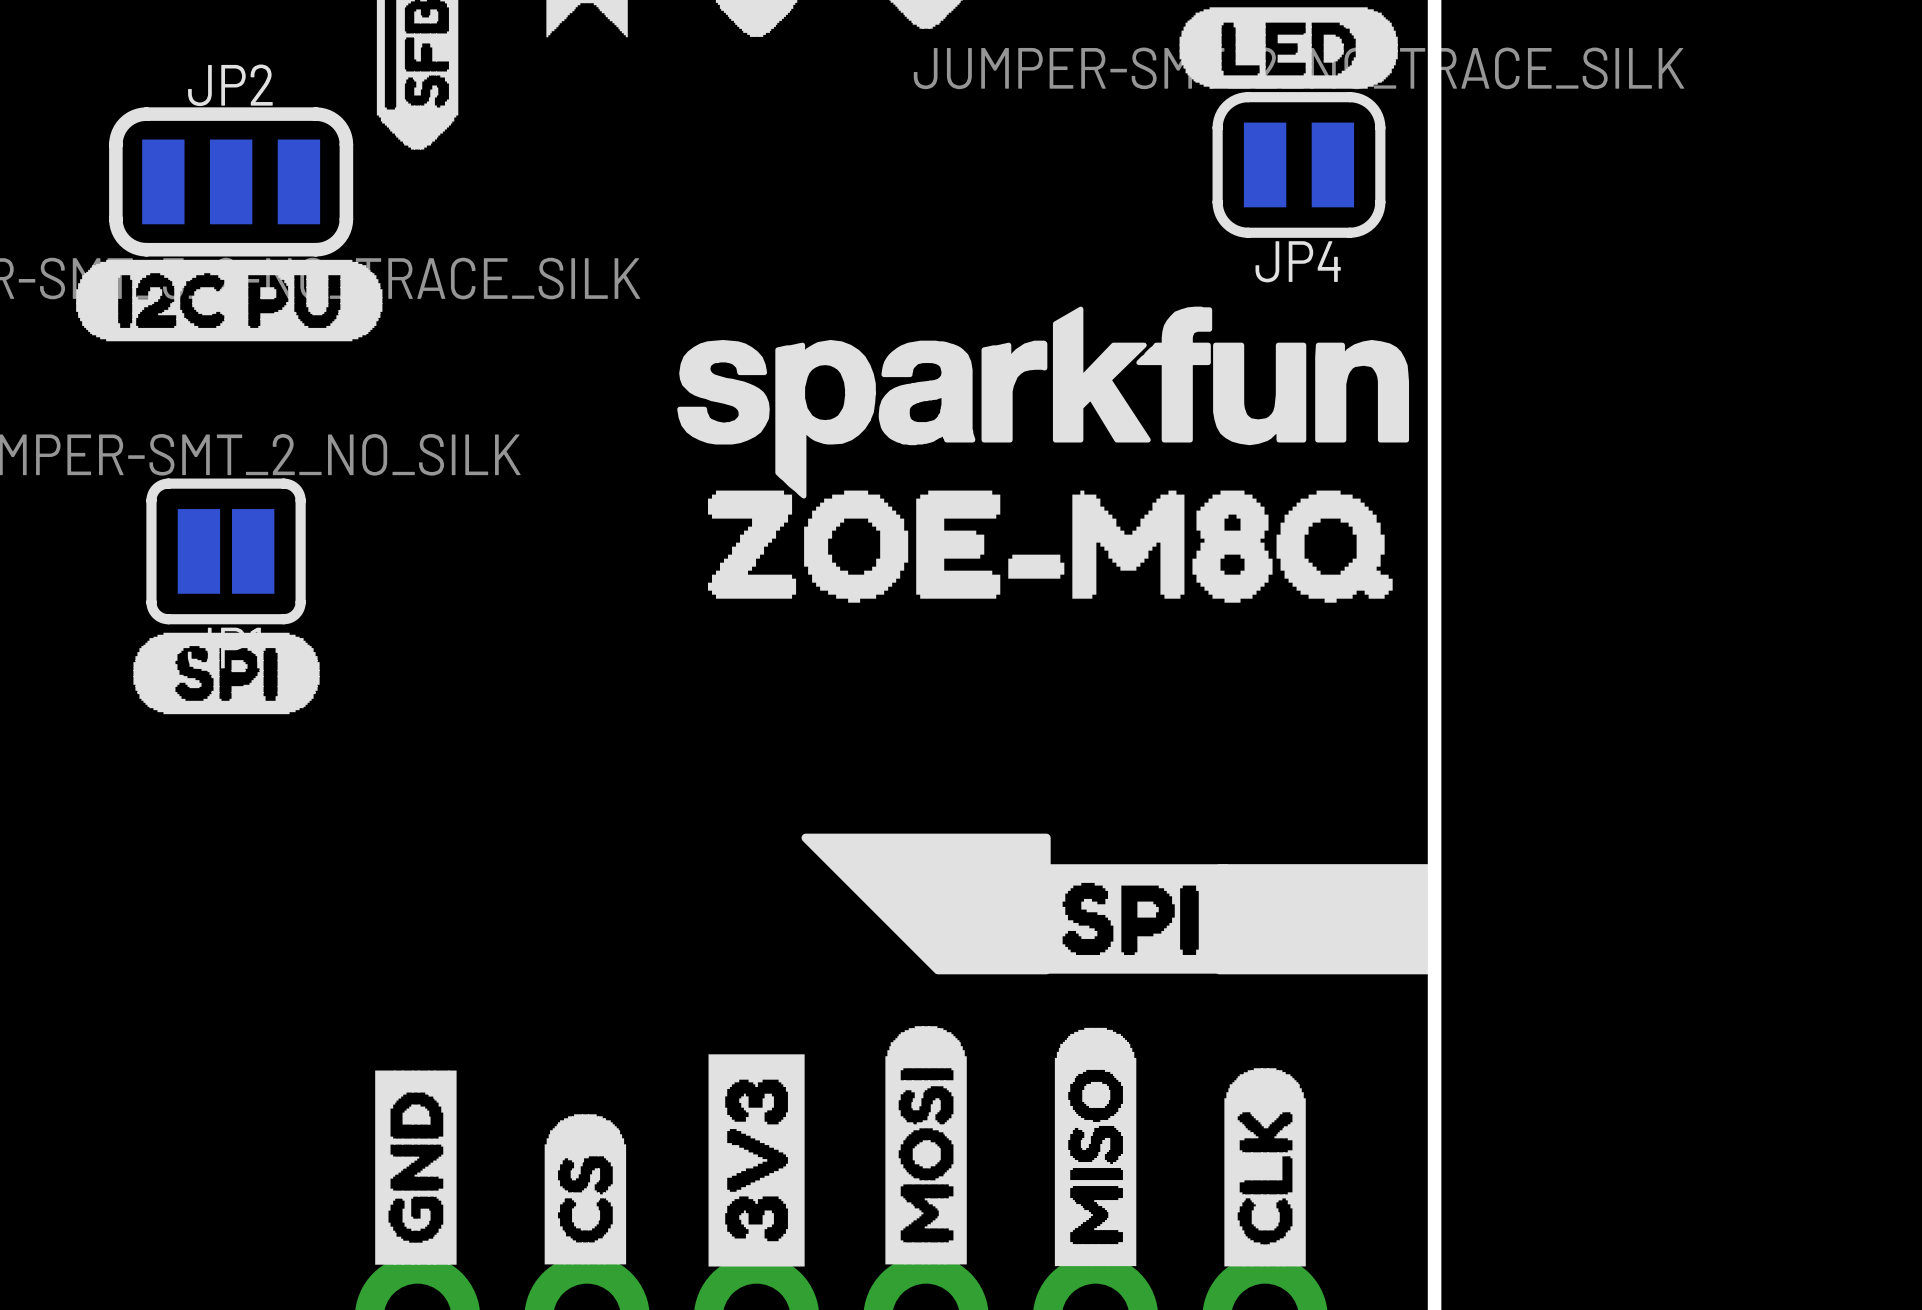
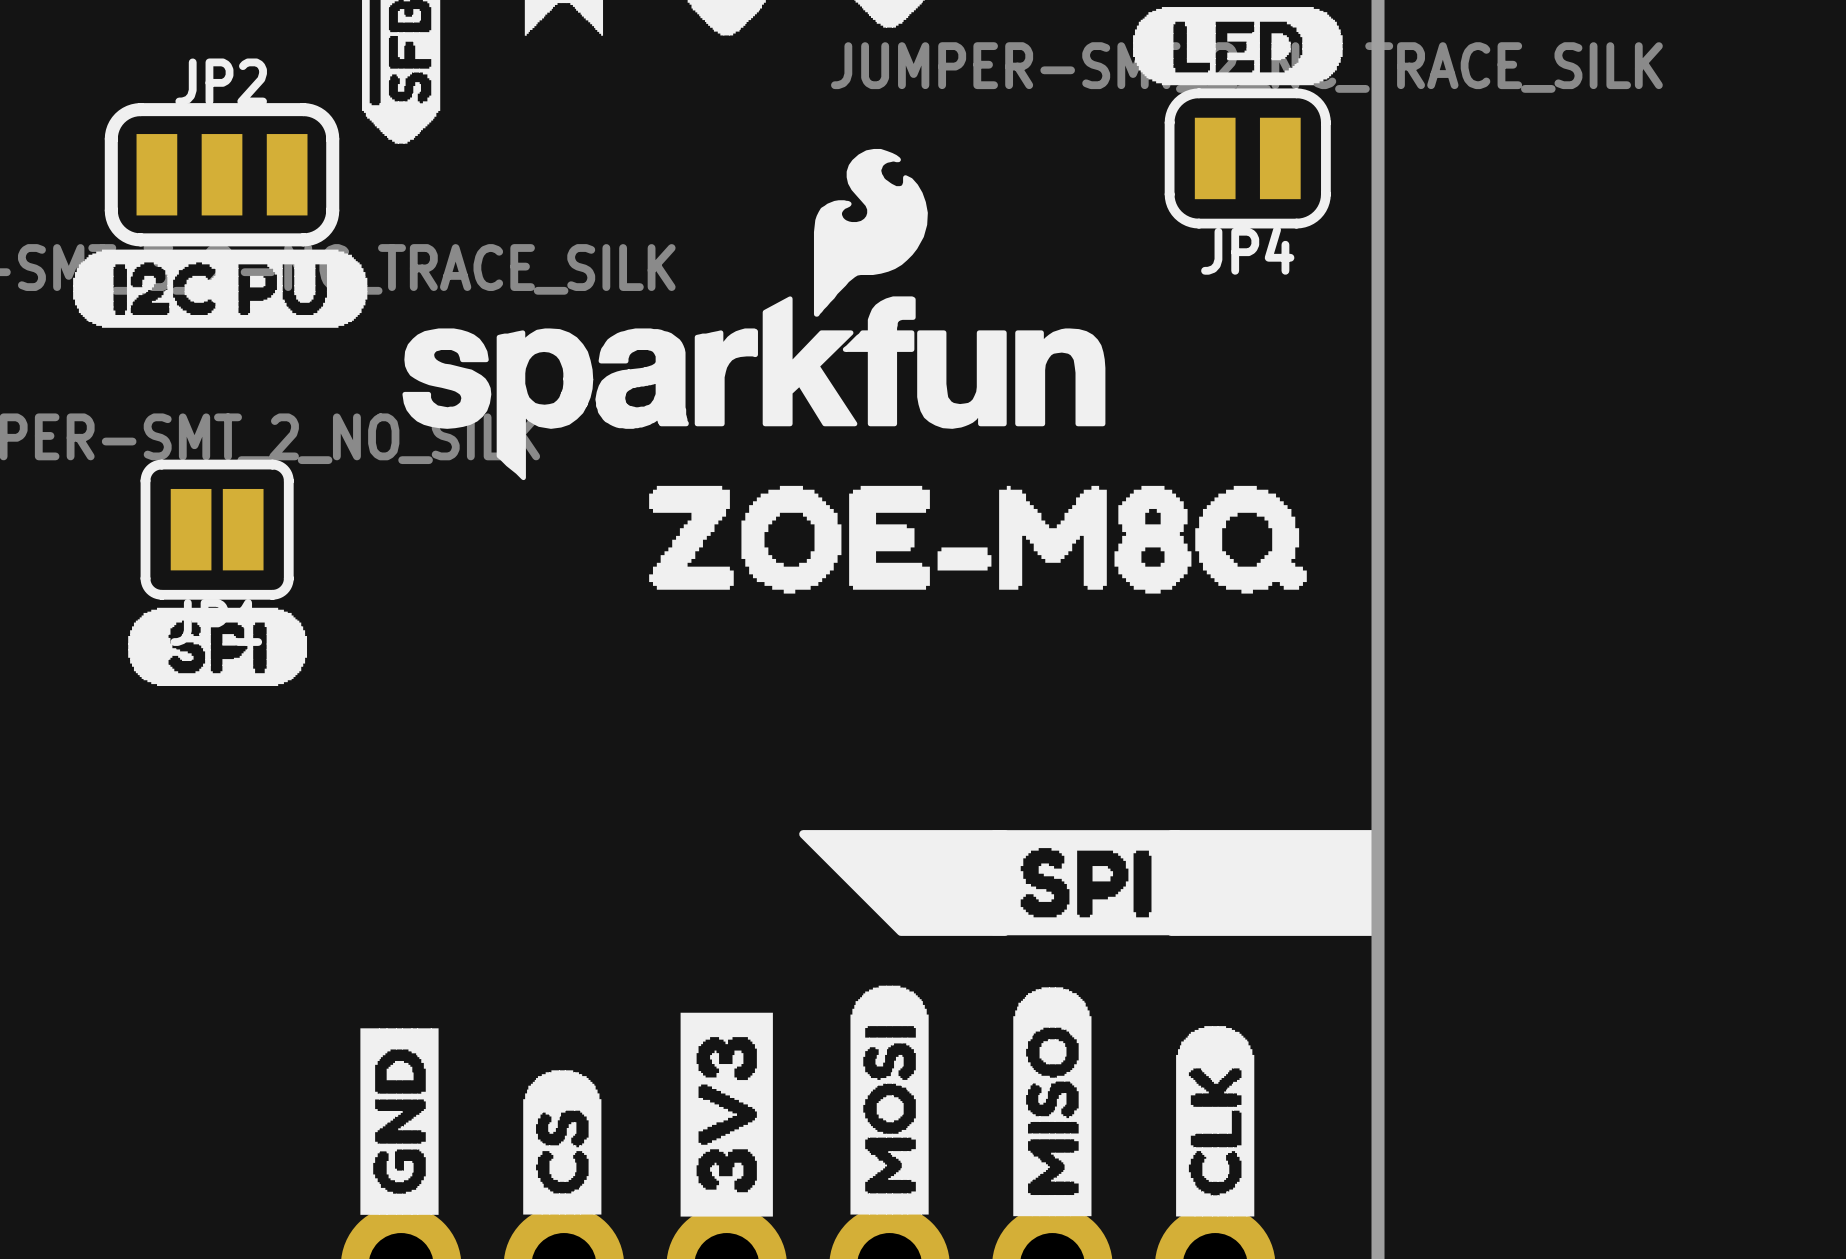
drawing: none -> [402, 148, 1106, 481]
drawing: [677, 306, 1410, 499] -> none
drawing position: (1050, 546) -> (977, 539)
drawing shape: [801, 833, 1051, 975] -> [799, 830, 1010, 936]

